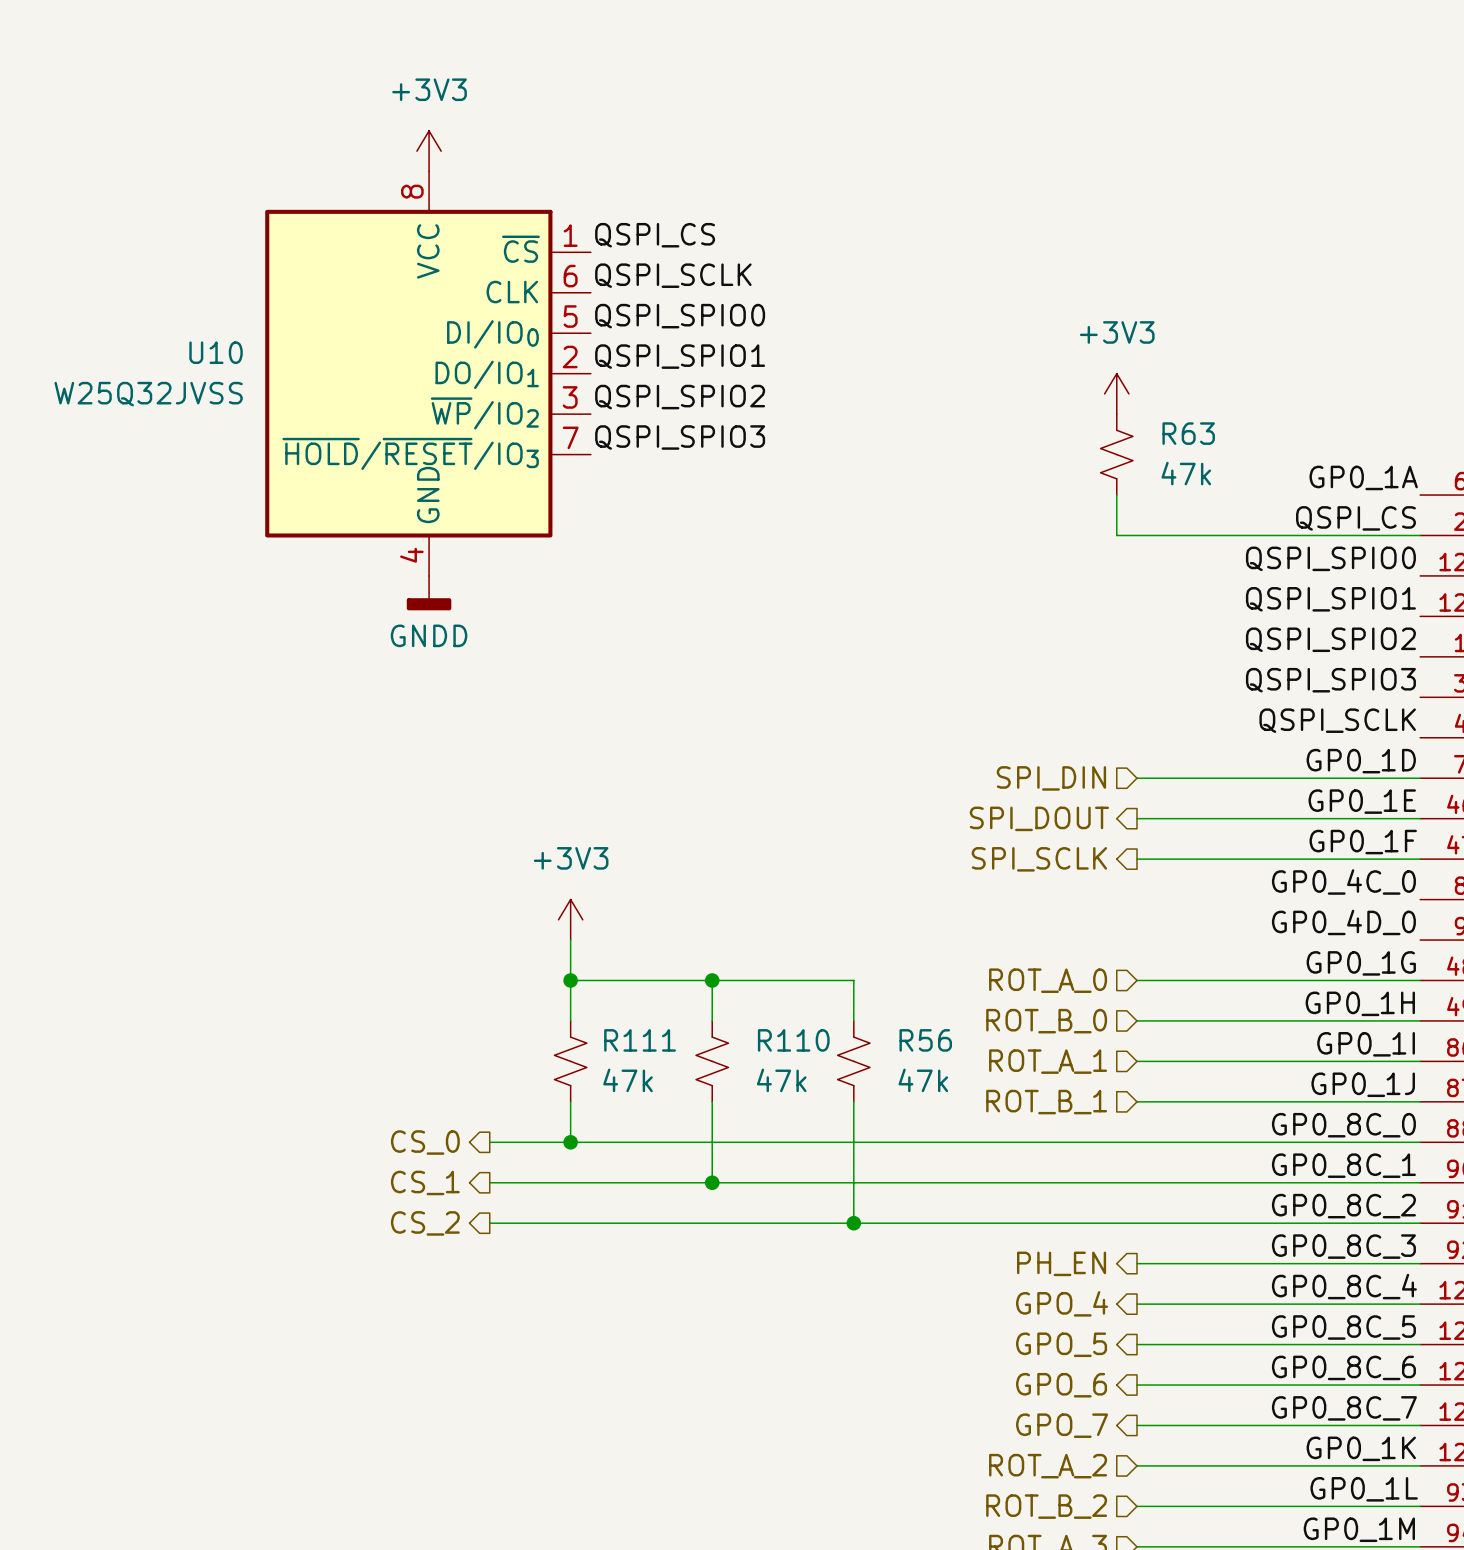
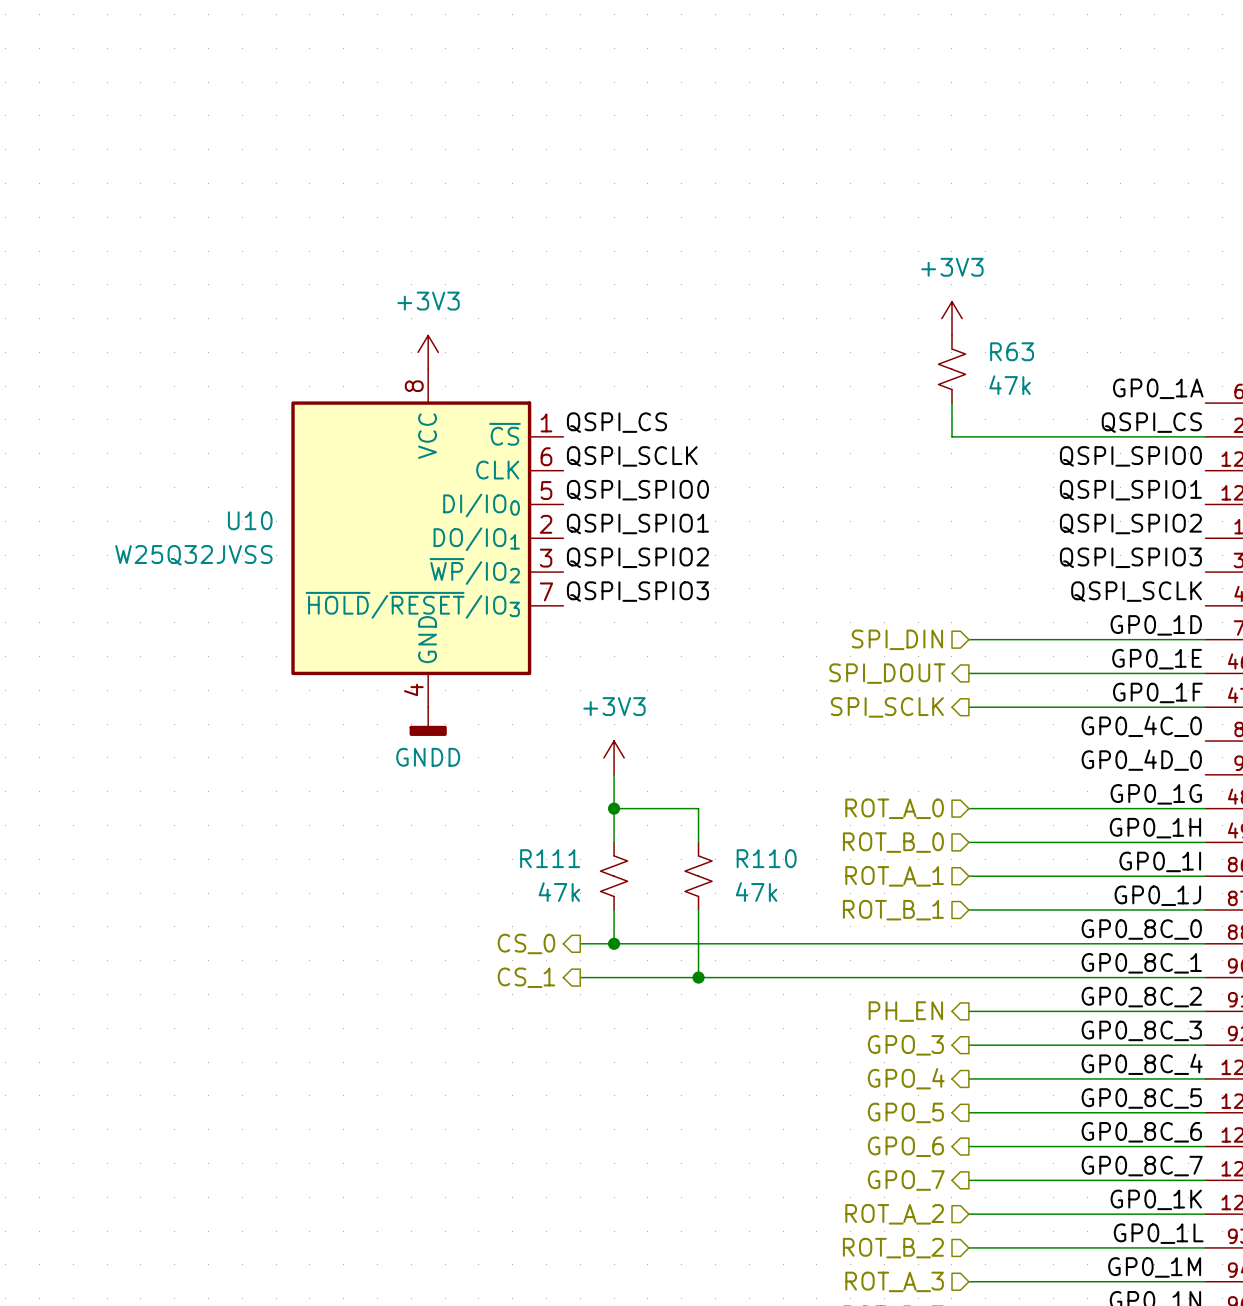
power symbol: +3V3 (429, 151) -> none
label position: QSPI_CS (655, 235) -> QSPI_CS (616, 422)
label position: QSPI_SCLK (673, 275) -> QSPI_SCLK (632, 456)
label position: QSPI_SPIO0 (680, 316) -> QSPI_SPIO0 (637, 490)
label position: QSPI_SPIO1 (680, 356) -> QSPI_SPIO1 (637, 523)
U10 position: (428, 373) -> (427, 538)
label position: QSPI_SPIO2 (680, 397) -> QSPI_SPIO2 (637, 557)
power symbol: none -> +3V3 (428, 352)
label position: QSPI_SPIO3 (680, 437) -> QSPI_SPIO3 (637, 591)
power symbol position: GNDD (429, 593) -> GNDD (428, 721)
power symbol position: +3V3 (570, 919) -> +3V3 (614, 757)
wire: (570, 940) (570, 1020) -> (698, 910) (698, 977)
wire: (570, 980) (712, 980) -> (614, 774) (614, 808)
junction: (570, 980) -> none
wire: (813, 980) (853, 980) (853, 1020) -> (698, 808) (698, 842)
R110 name: R110 (793, 1040) -> R111 (550, 858)
R111: 47k (570, 1061) -> none
R110: none -> 47k (698, 876)
R56: 47k (853, 1061) -> none
R110 value position: 47k (781, 1080) -> 47k (559, 892)
wire: (570, 1101) (570, 1142) -> none
wire: (853, 1101) (853, 1223) -> none
hierarchical label position: CS_0 (425, 1142) -> CS_0 (526, 943)
wire: (489, 1142) (671, 1142) -> none
junction: (570, 1142) -> none
wire: (712, 1142) (712, 1182) -> none
hierarchical label position: CS_1 (425, 1182) -> CS_1 (526, 977)
wire: (489, 1182) (671, 1182) -> none
junction position: (712, 1182) -> (614, 943)
junction: none -> (698, 977)
hierarchical label: CS_2 (425, 1223) -> none
wire: (489, 1223) (1137, 1223) -> none
junction: (853, 1223) -> none
hierarchical label: none -> PH_EN (905, 1011)
hierarchical label: PH_EN (1061, 1263) -> GPO_3 (905, 1045)

